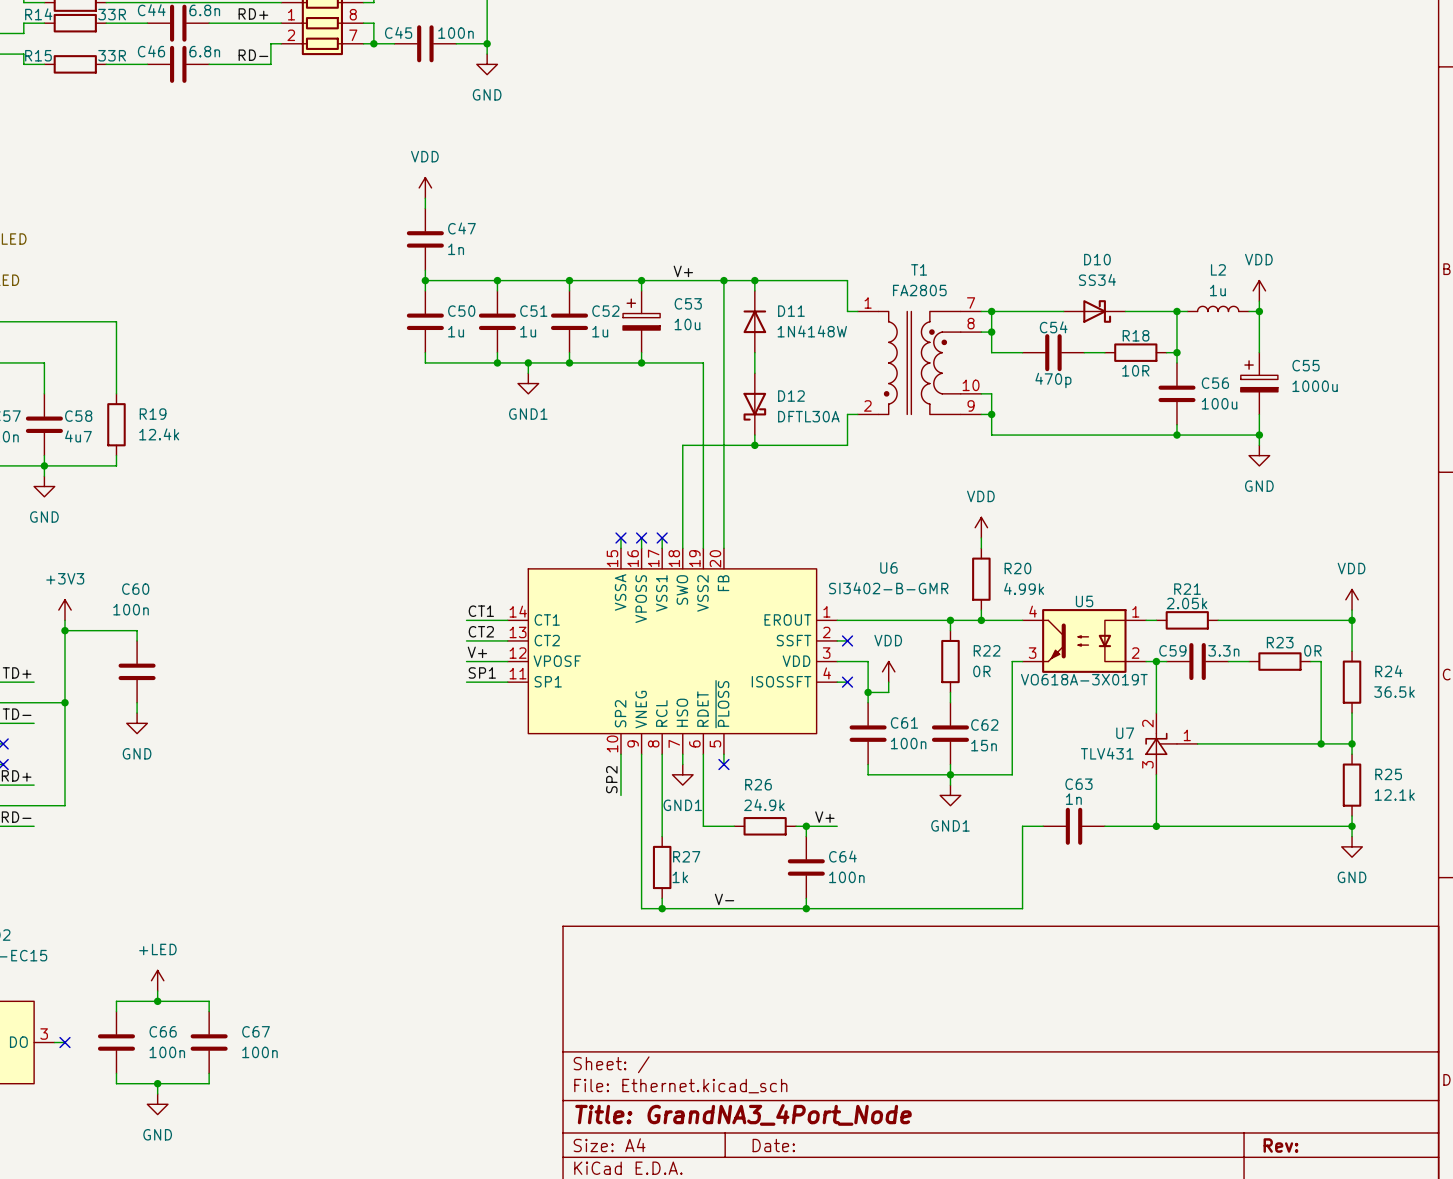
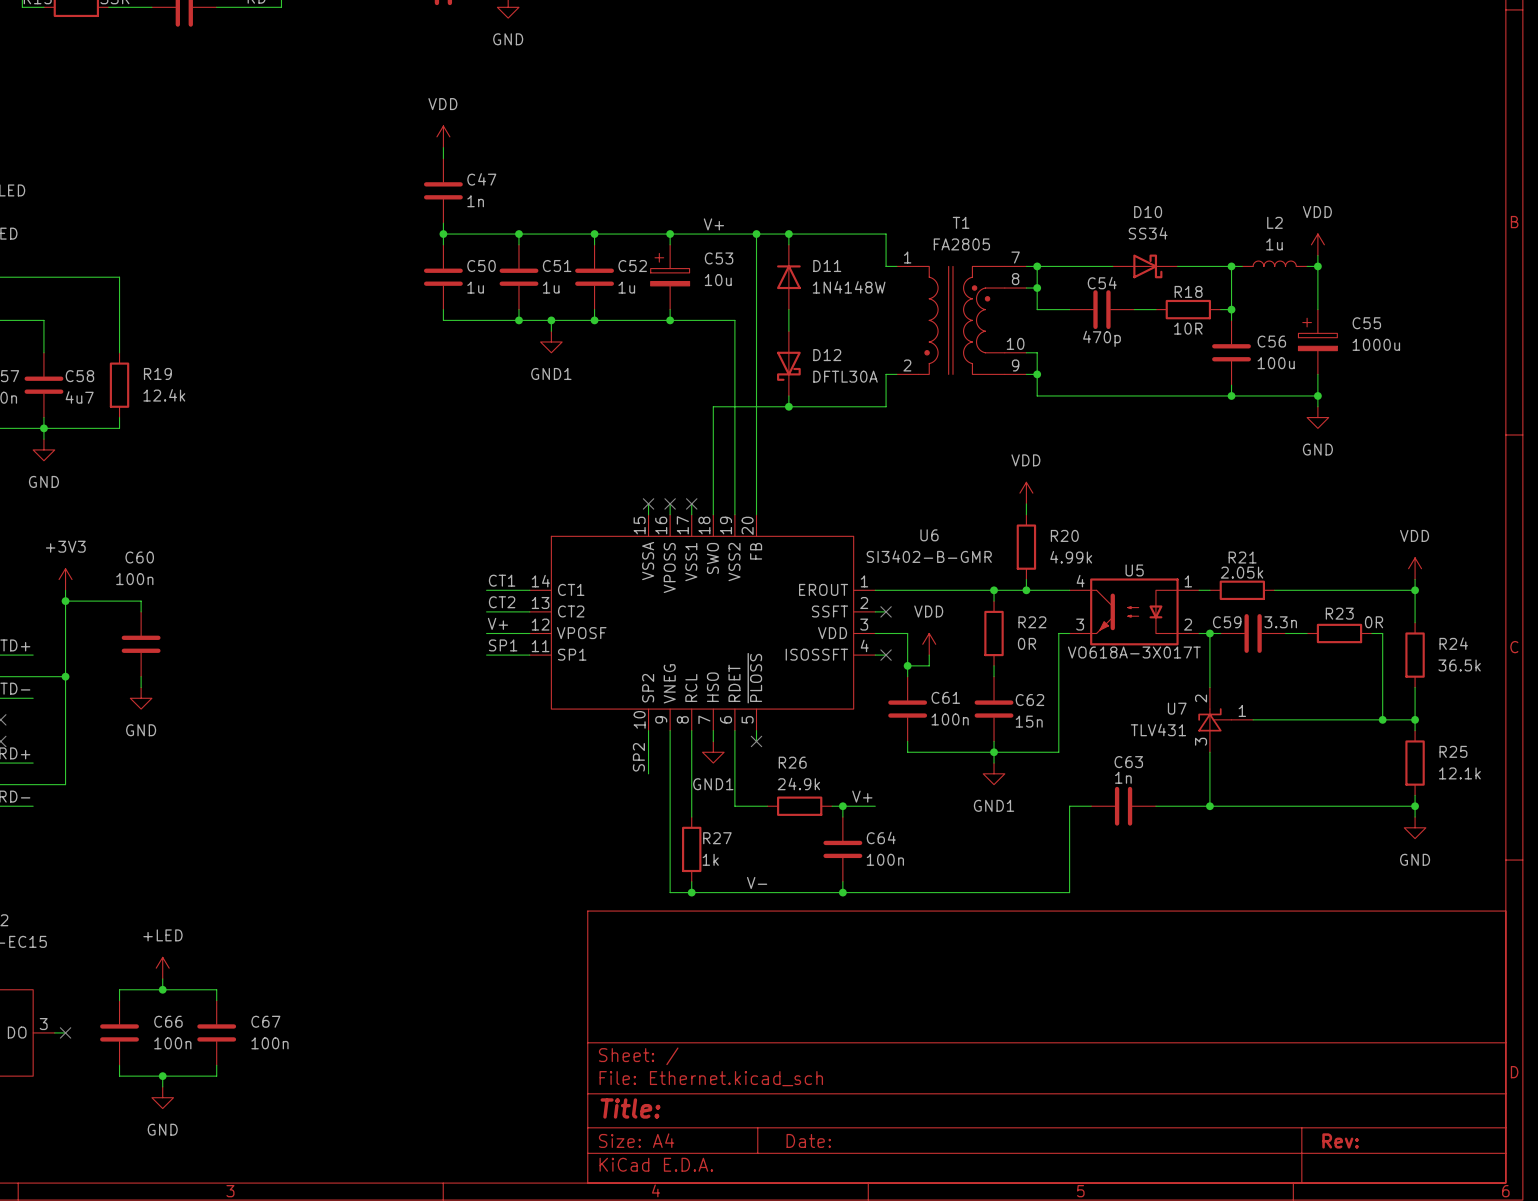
U5 value: VO618A-3X019T (1084, 679) -> VO618A-3X017T (1134, 652)
title block: Title: GrandNA3_4Port_Node (743, 1114) -> Title: (630, 1108)

